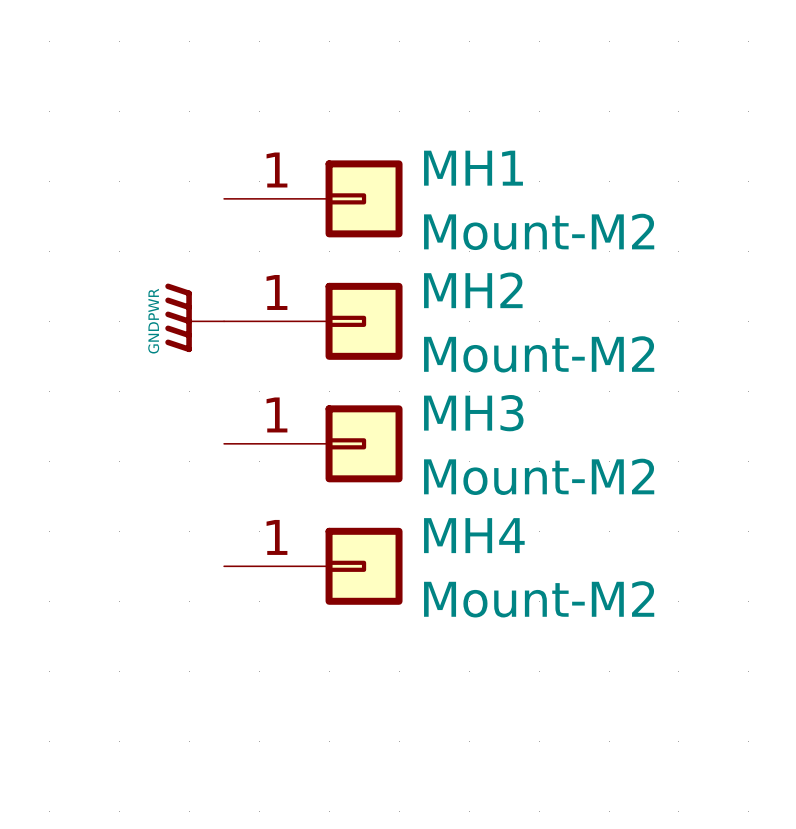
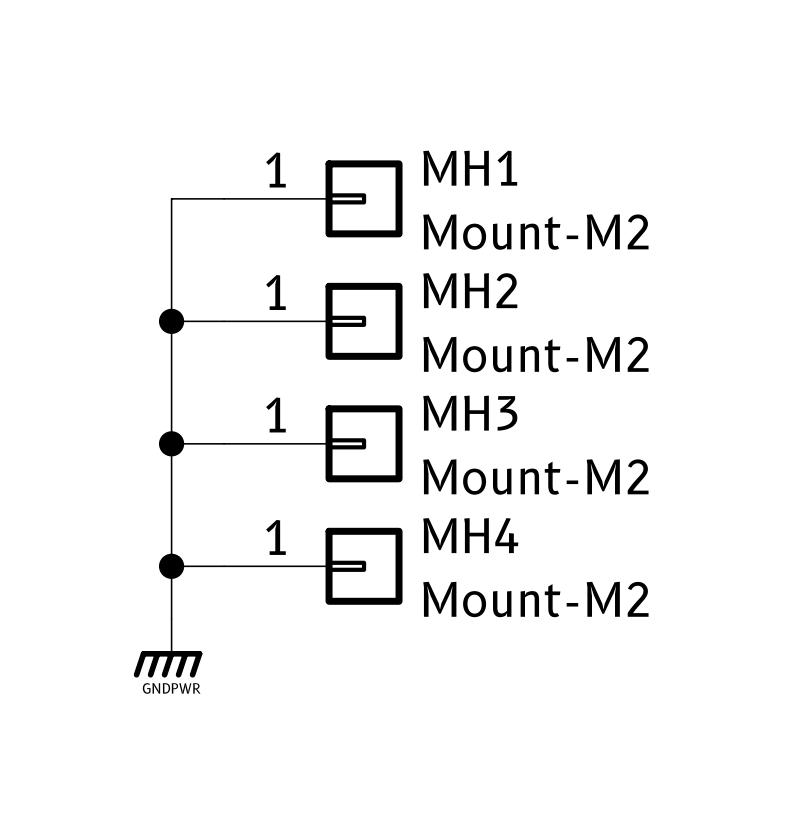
wire: none -> (224, 198) (171, 198) (171, 618)
power symbol rotation: 0° (194, 317) -> 90° counterclockwise (168, 648)
power symbol position: GNDPWR (194, 317) -> GNDPWR (168, 648)
junction: none -> (171, 321)
wire: none -> (171, 443) (224, 443)
junction: none -> (171, 443)
wire: none -> (171, 566) (224, 566)
junction: none -> (171, 566)

